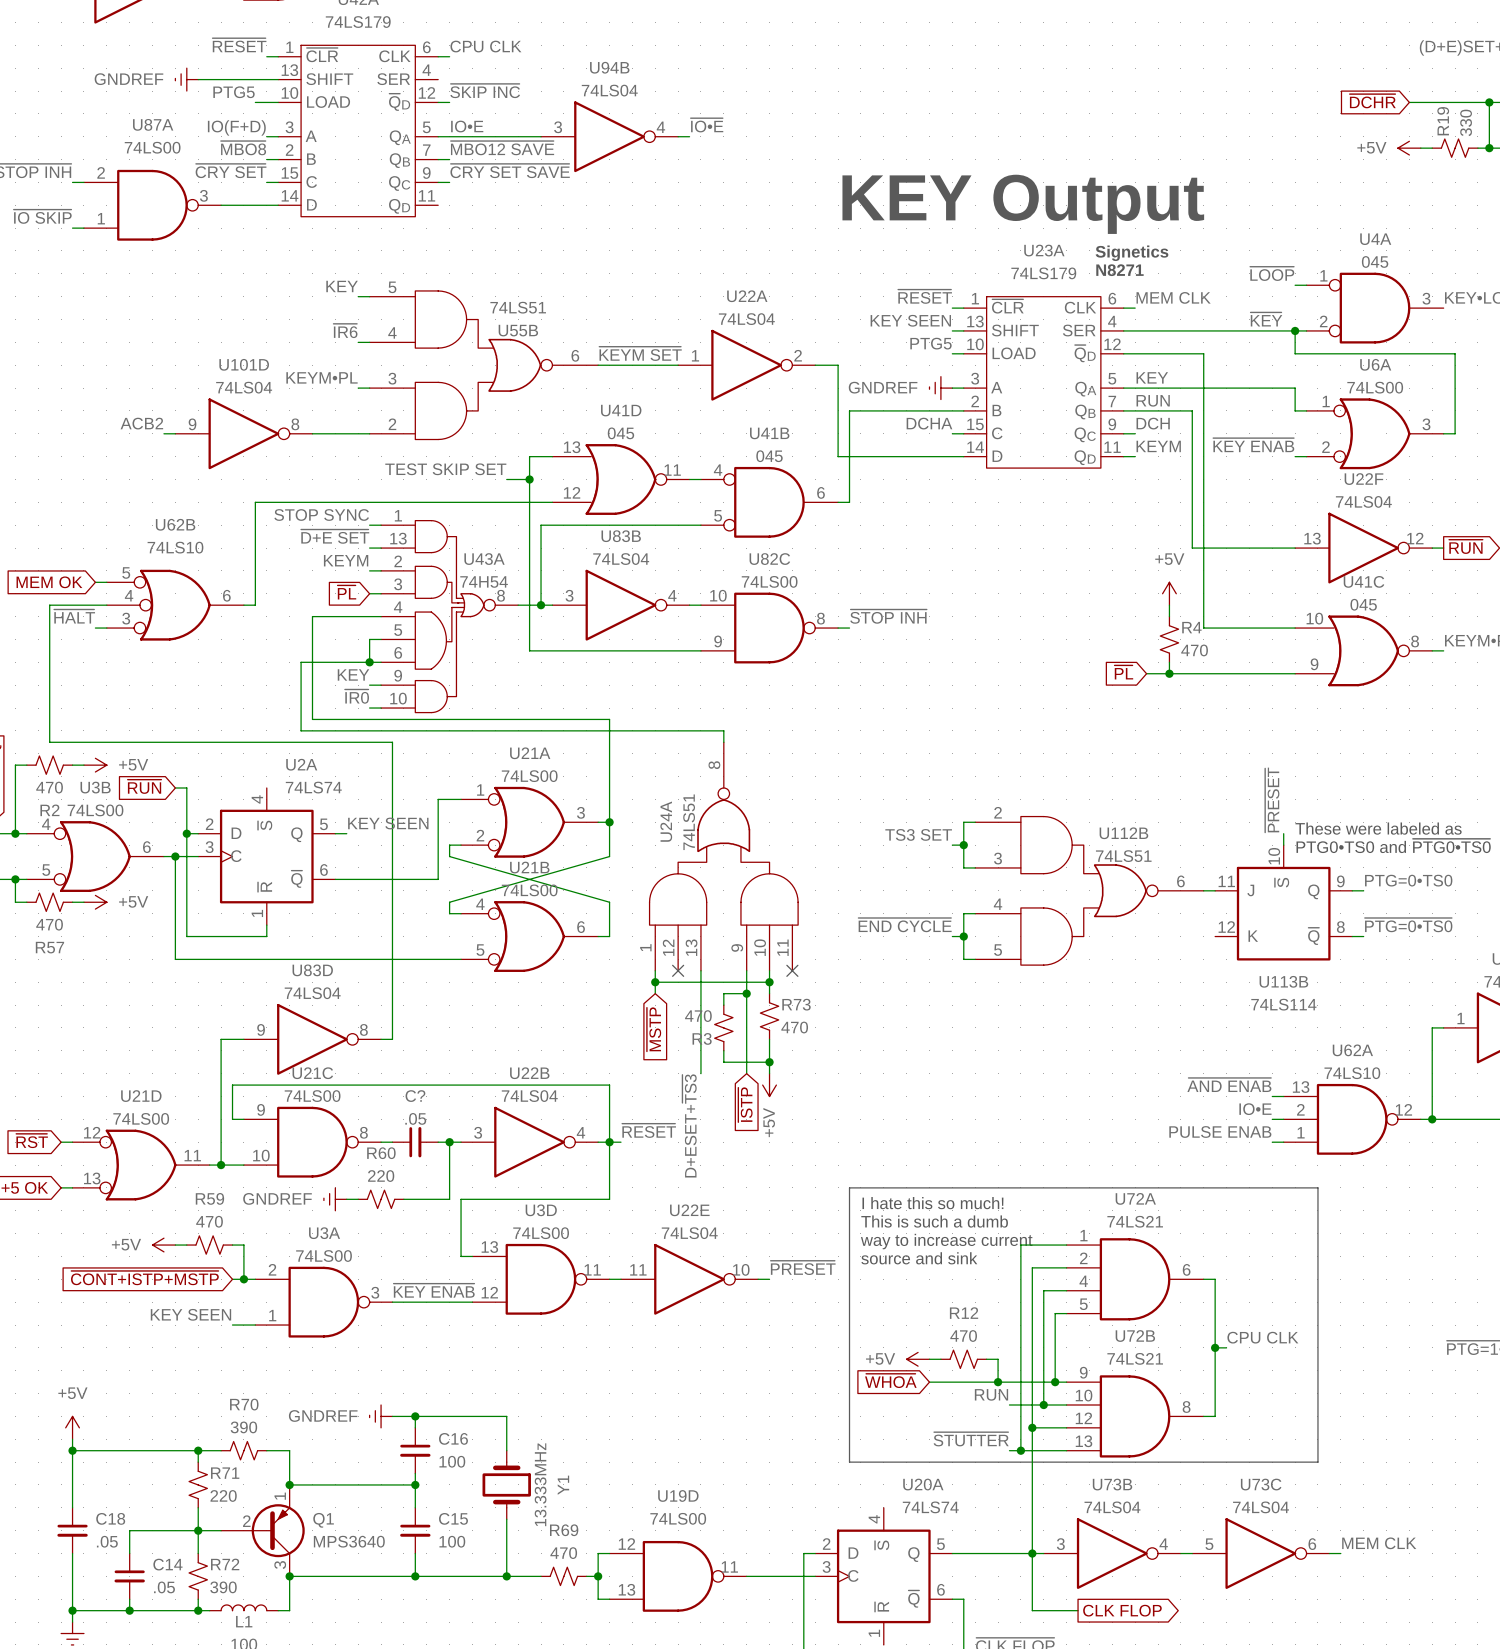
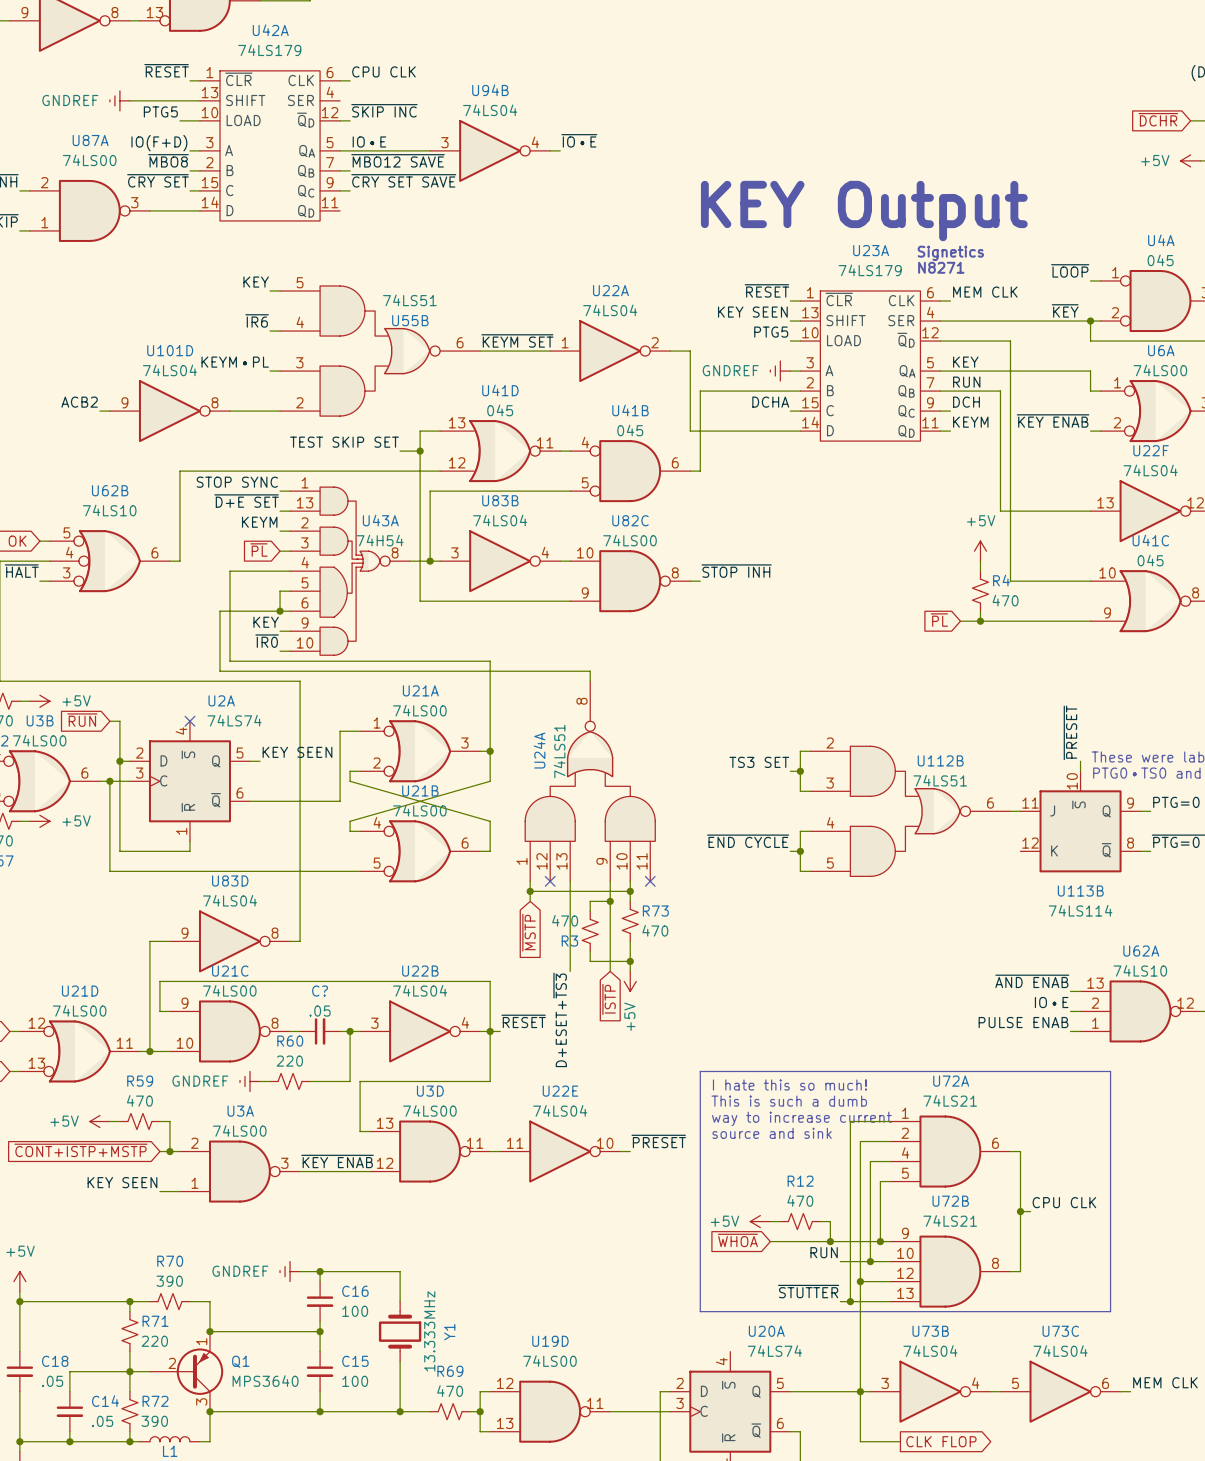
no-connect mark: none -> (189, 721)

